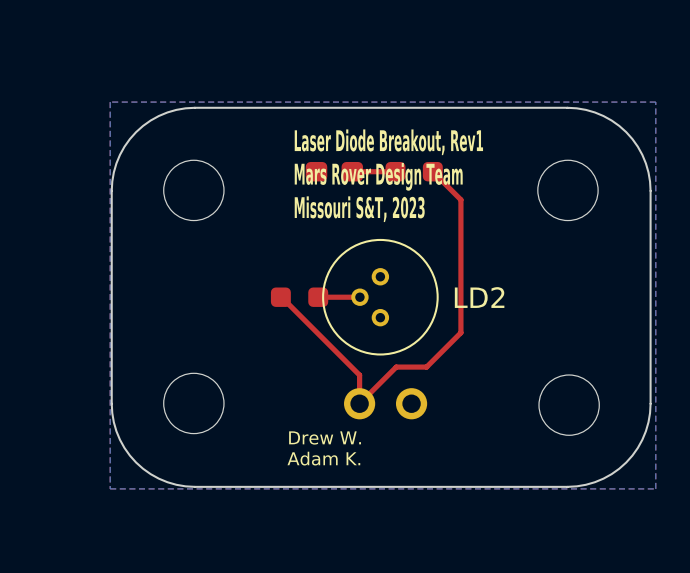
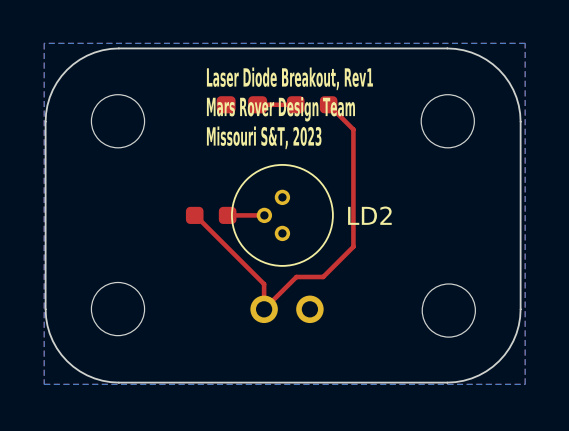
text: Drew W. (325, 437) -> none
text: Adam K. (323, 458) -> none

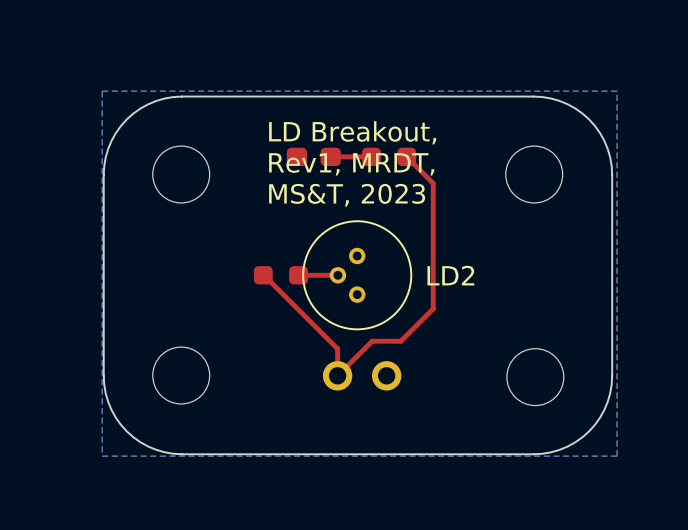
text: Laser Diode Breakout, Rev1 (289, 78) -> LD Breakout, (352, 132)
text: Mars Rover Design Team (280, 109) -> Rev1, MRDT, (351, 164)
text: Missouri S&T, 2023 (264, 137) -> MS&T, 2023 (347, 195)

